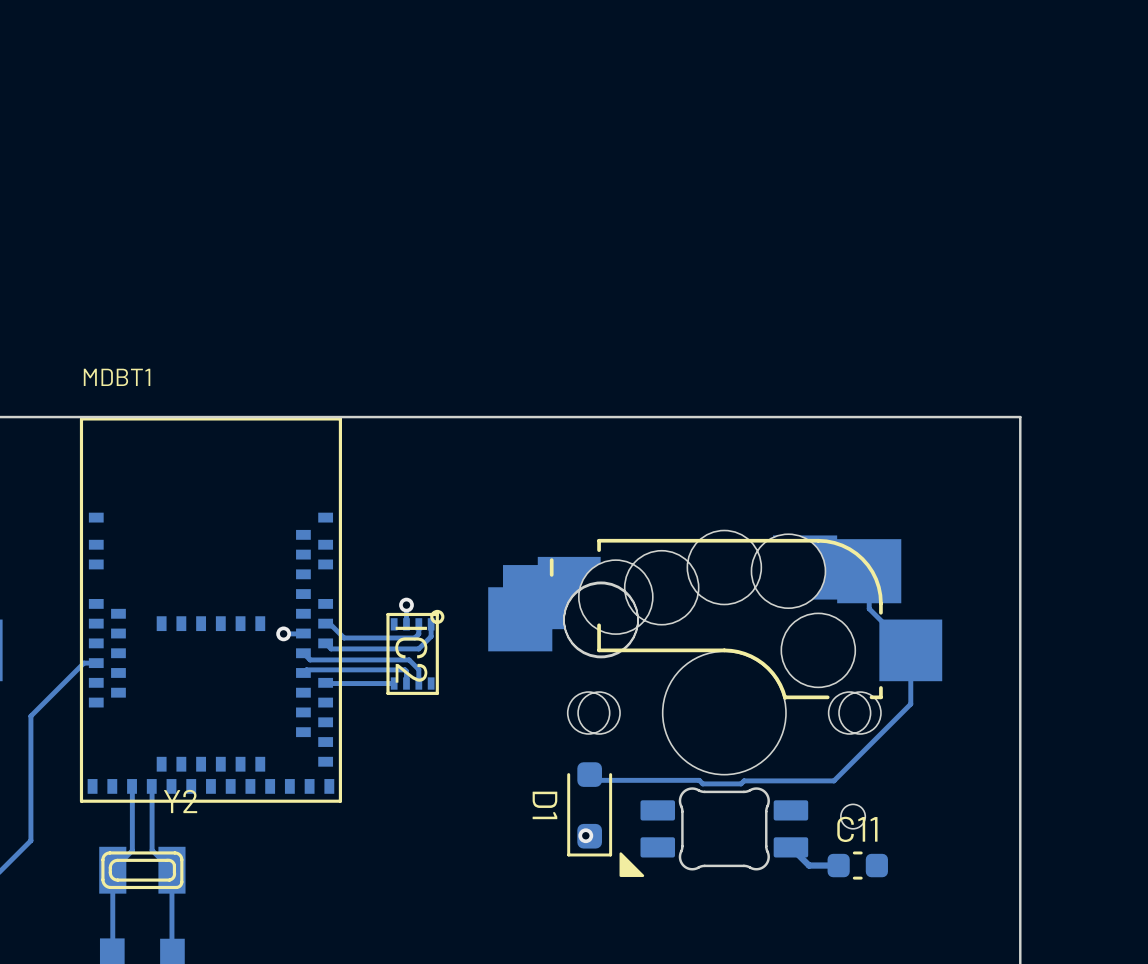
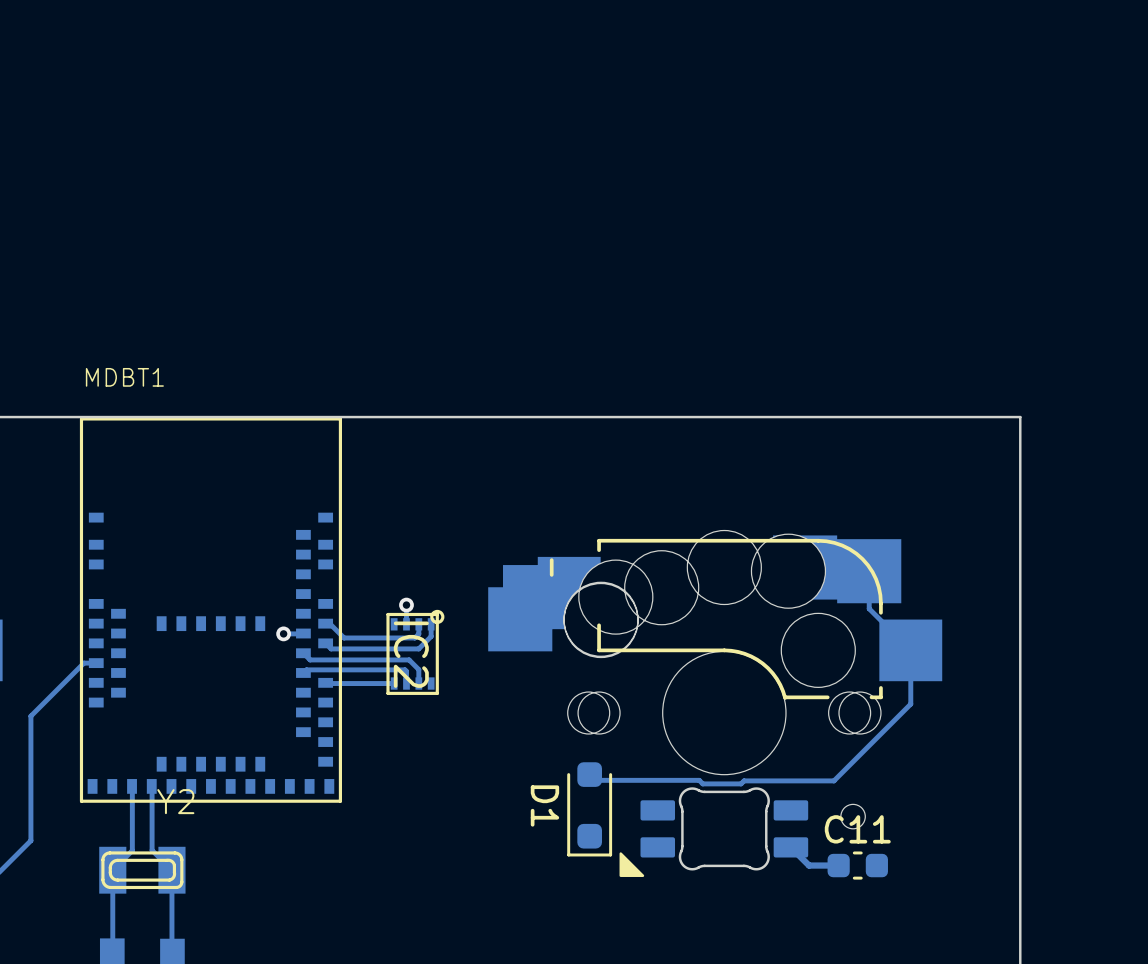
via: (585, 835) -> none

